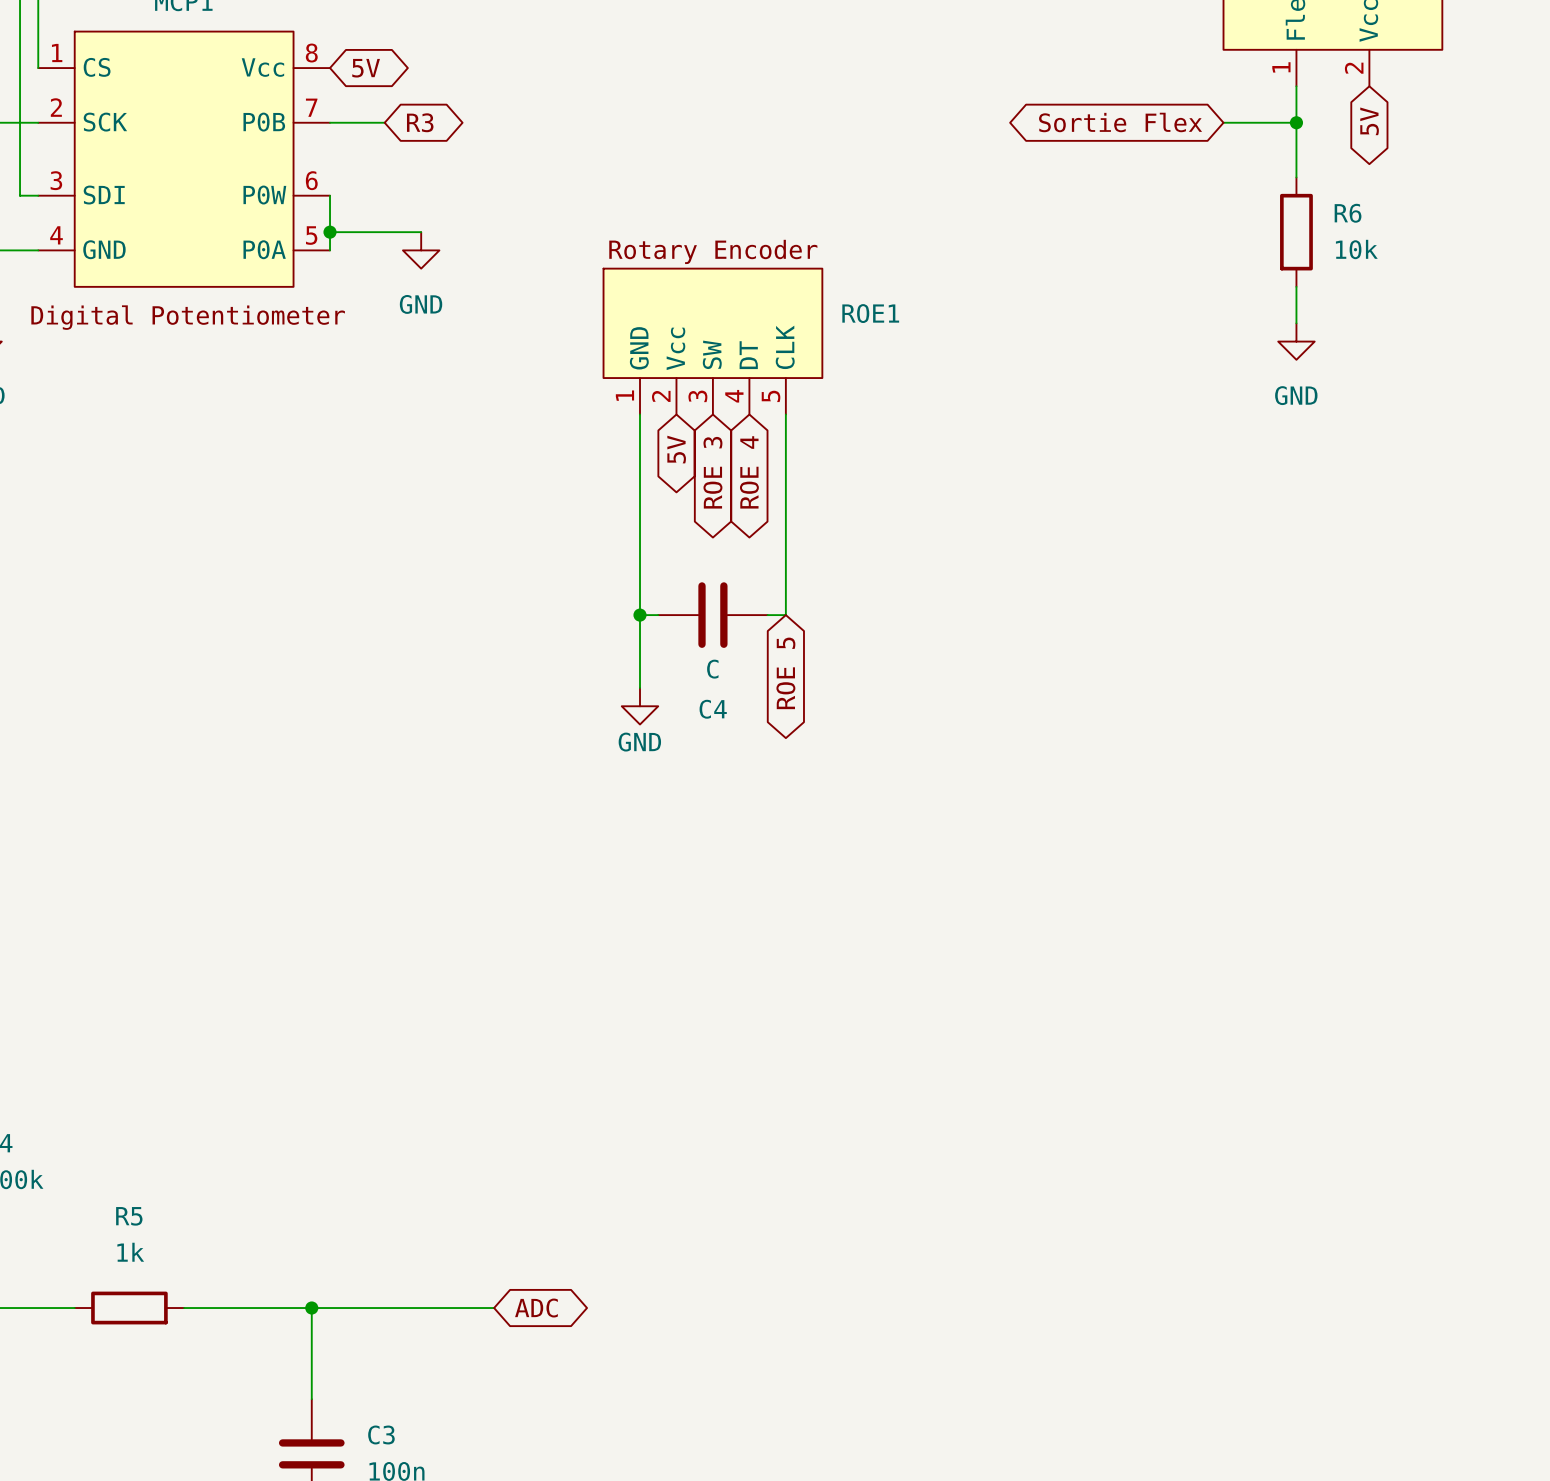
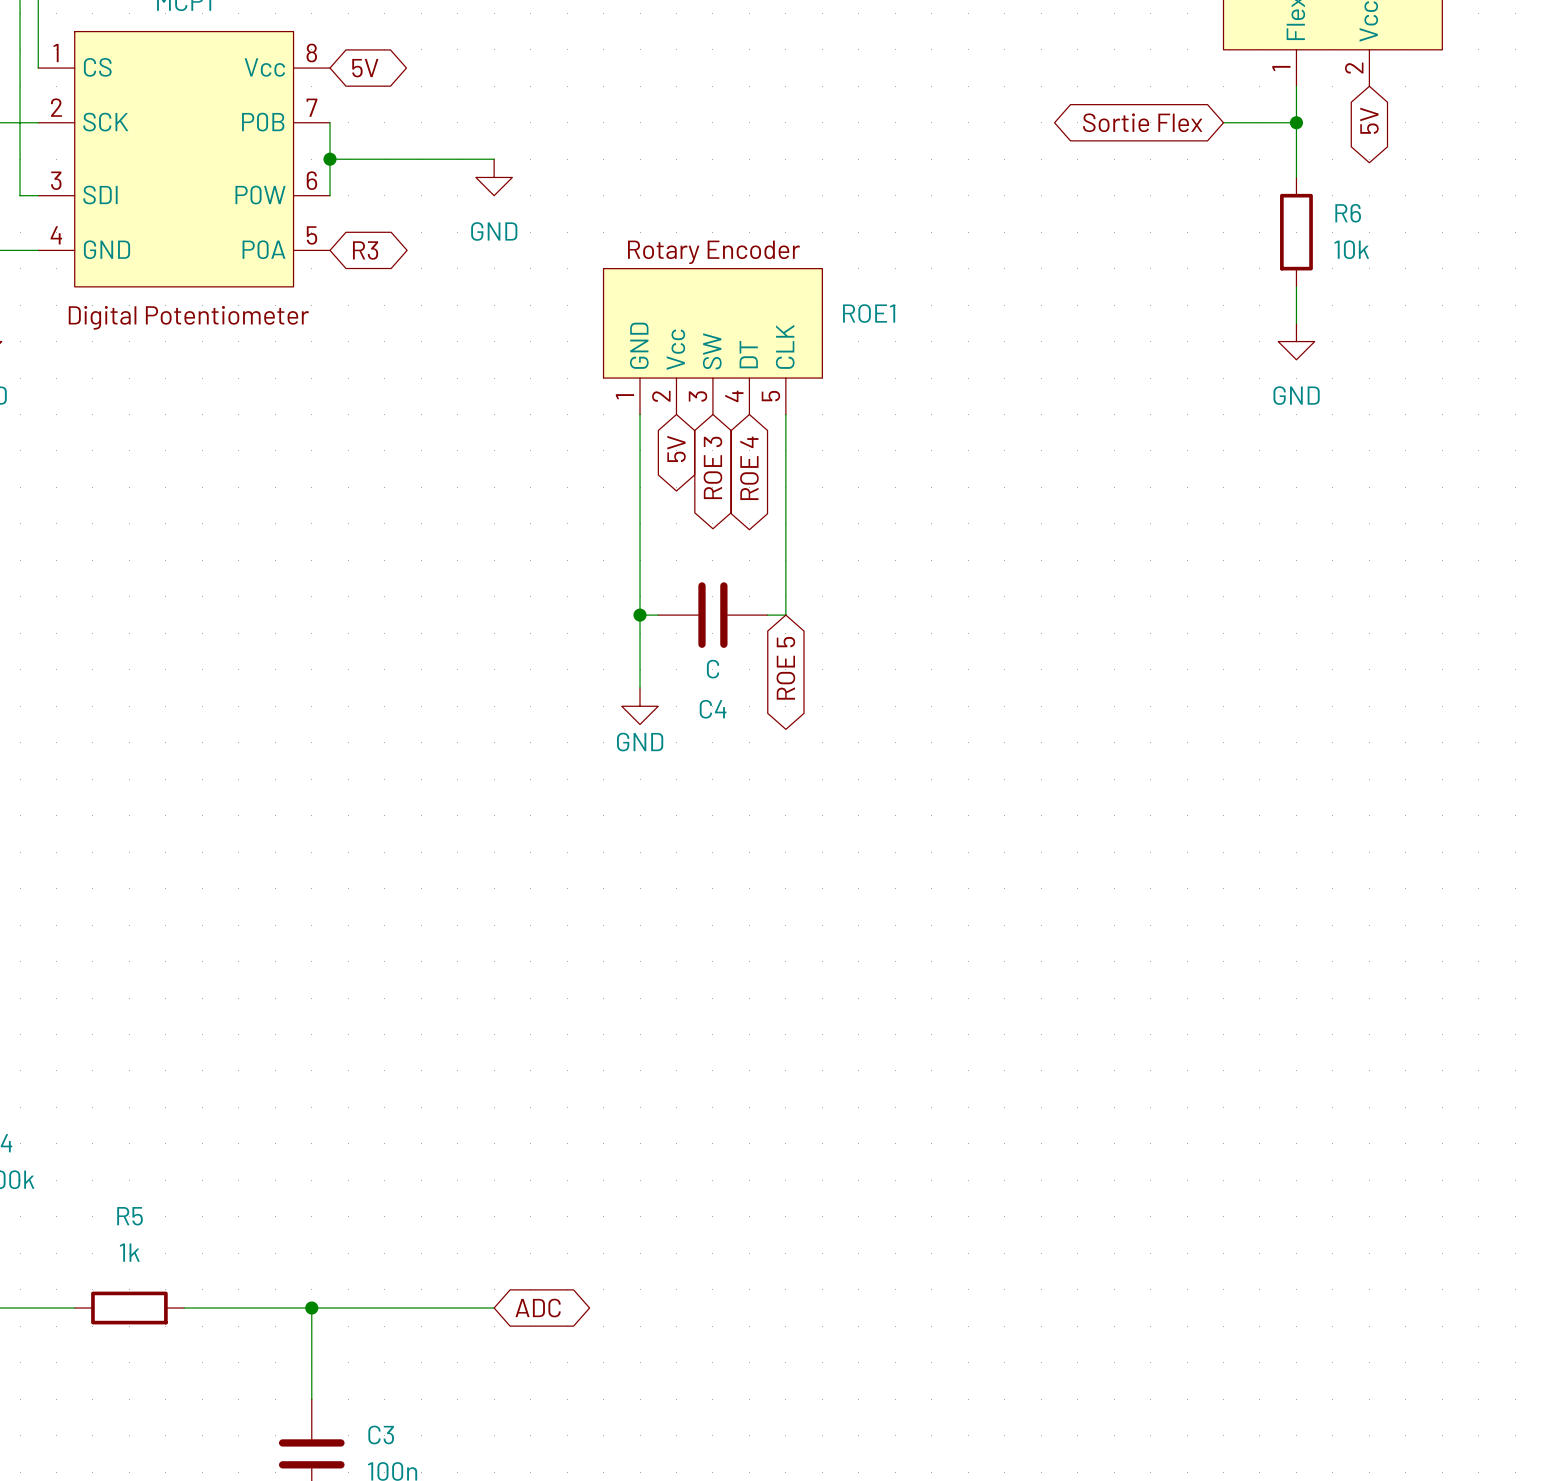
wire: (330, 122) (384, 122) -> (330, 122) (330, 195)
global label position: R3 (420, 122) -> R3 (365, 250)
wire: none -> (330, 159) (494, 159)
wire: (330, 195) (330, 250) -> none
wire: (330, 232) (421, 232) -> none
junction position: (330, 232) -> (330, 159)
power symbol position: GND (421, 250) -> GND (494, 177)

